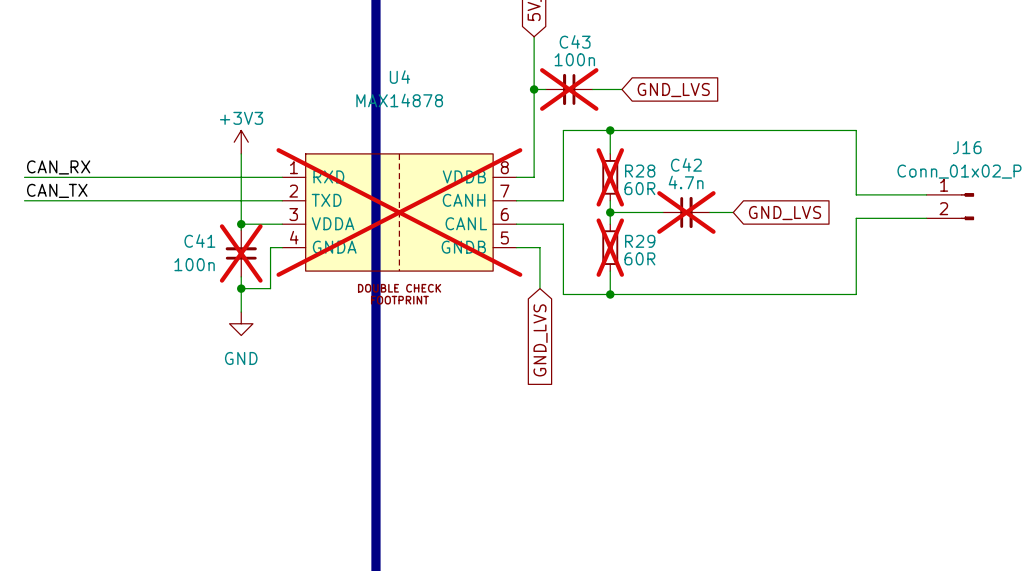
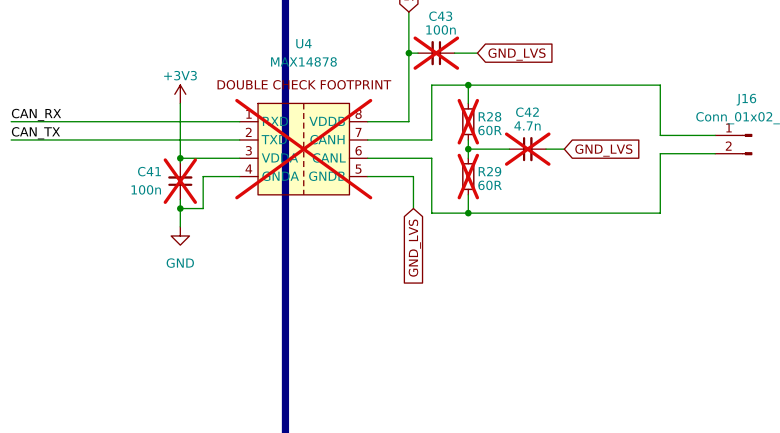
U4 symbol: [282, 153, 517, 272] -> [239, 103, 368, 195]

